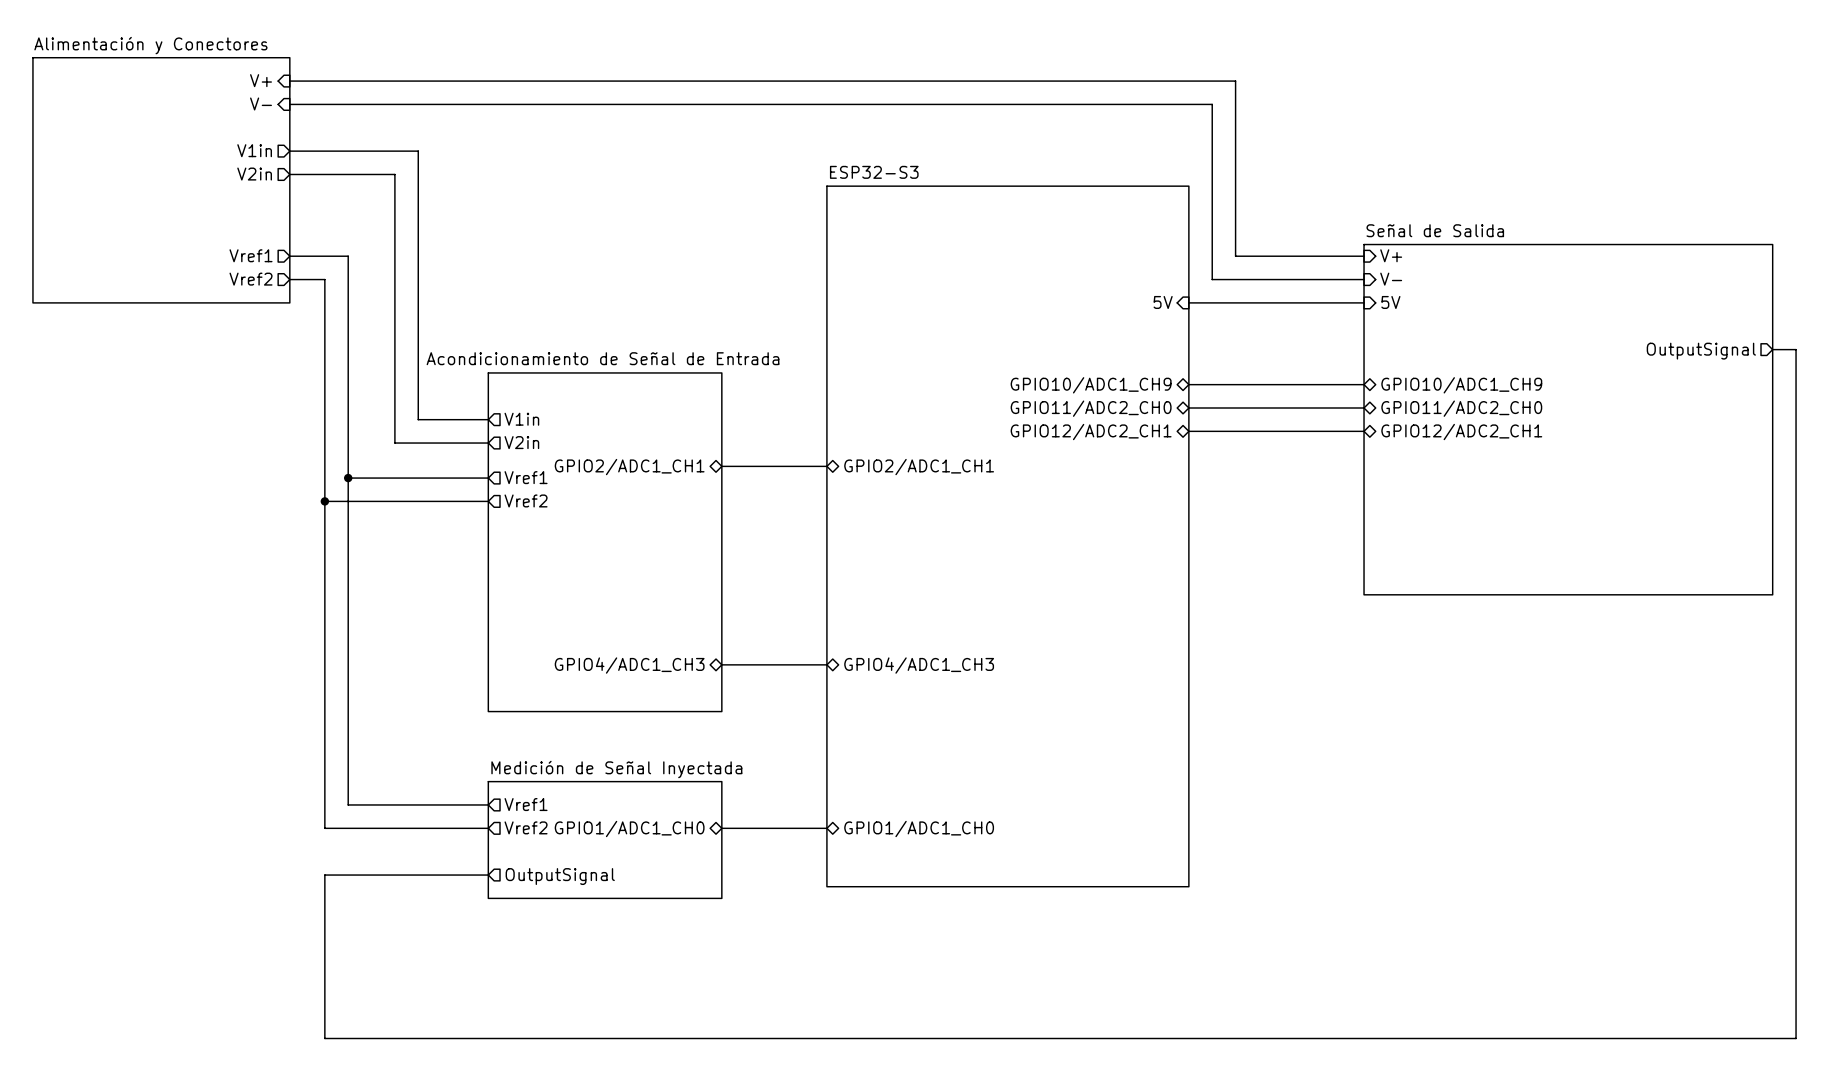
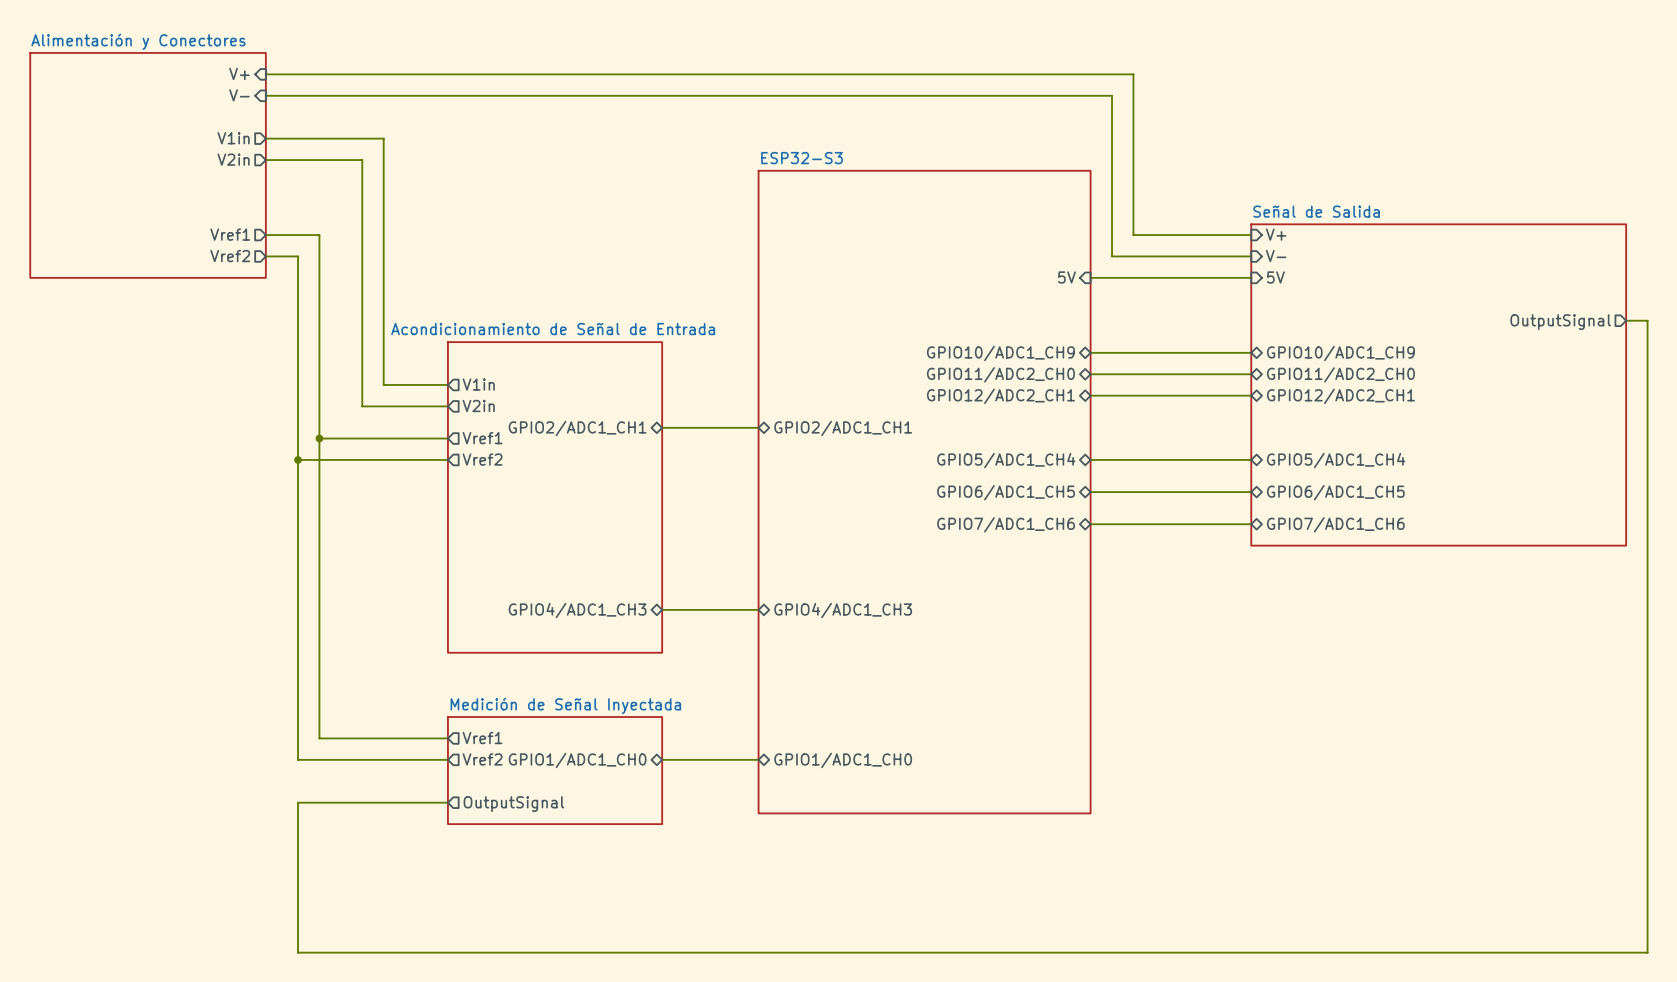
wire: none -> (1090, 459) (1251, 459)
sheet pin: none -> GPIO5/ADC1_CH4 (1006, 460)
sheet pin: none -> GPIO5/ADC1_CH4 (1336, 460)
wire: none -> (1090, 492) (1251, 492)
sheet pin: none -> GPIO6/ADC1_CH5 (1006, 492)
sheet pin: none -> GPIO6/ADC1_CH5 (1335, 492)
wire: none -> (1090, 524) (1251, 524)
sheet pin: none -> GPIO7/ADC1_CH6 (1006, 524)
sheet pin: none -> GPIO7/ADC1_CH6 (1335, 524)

